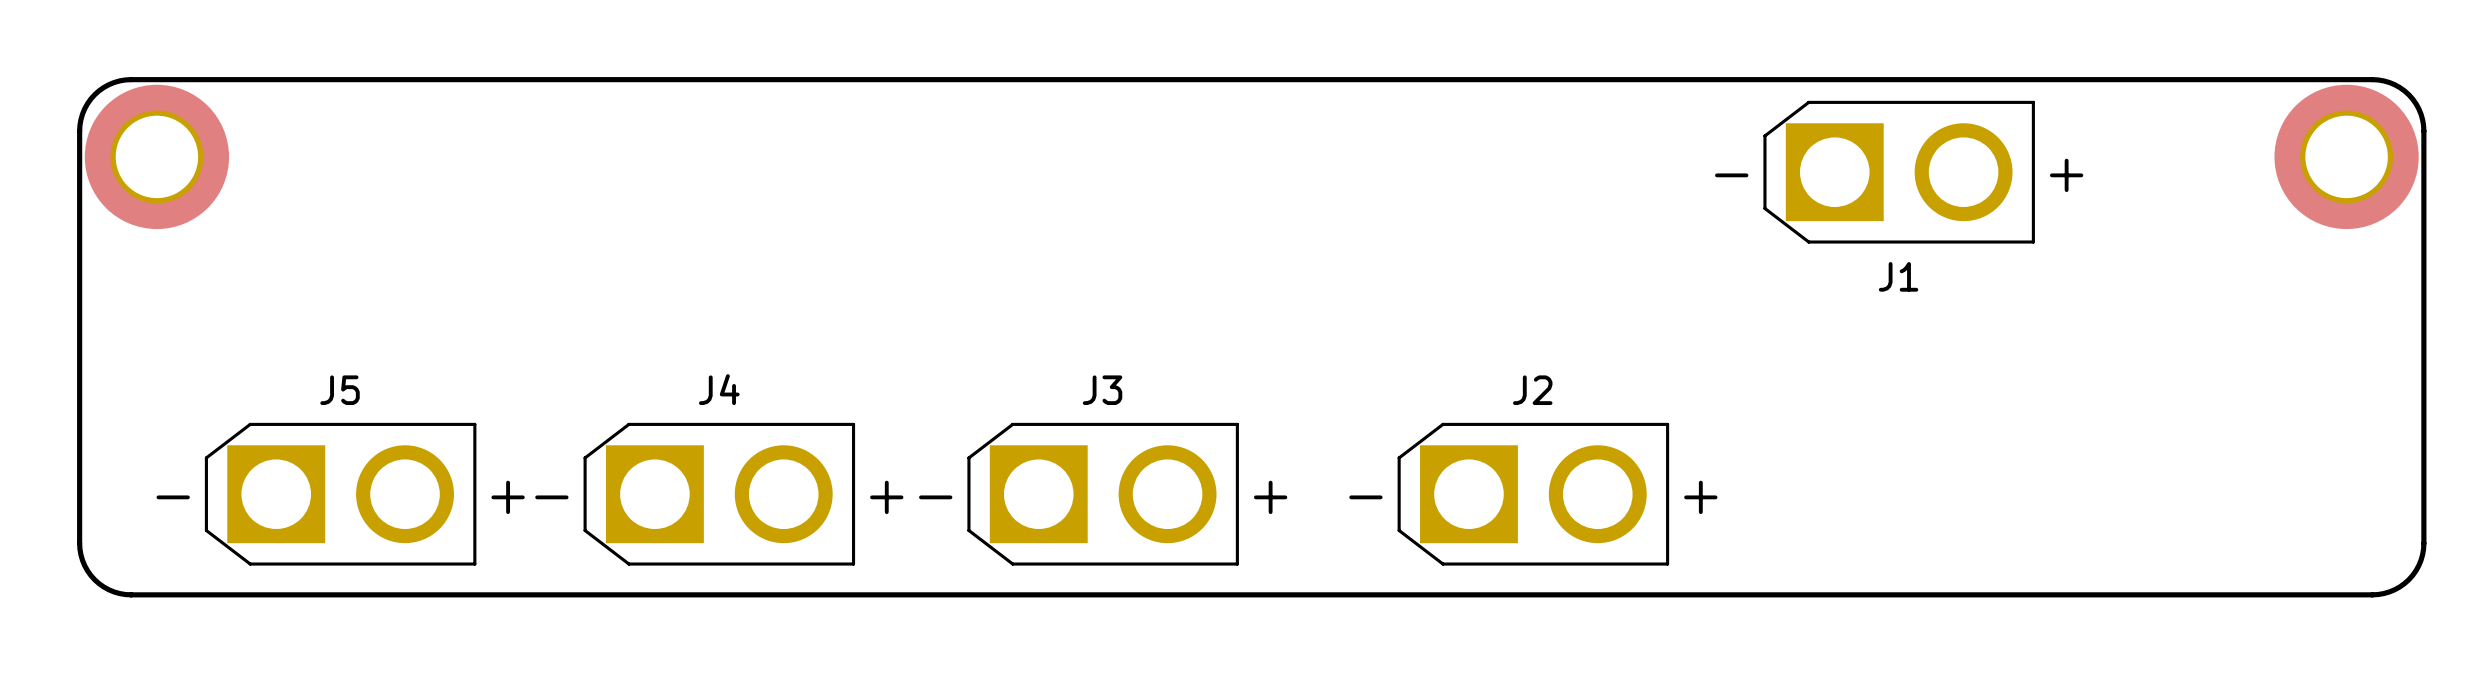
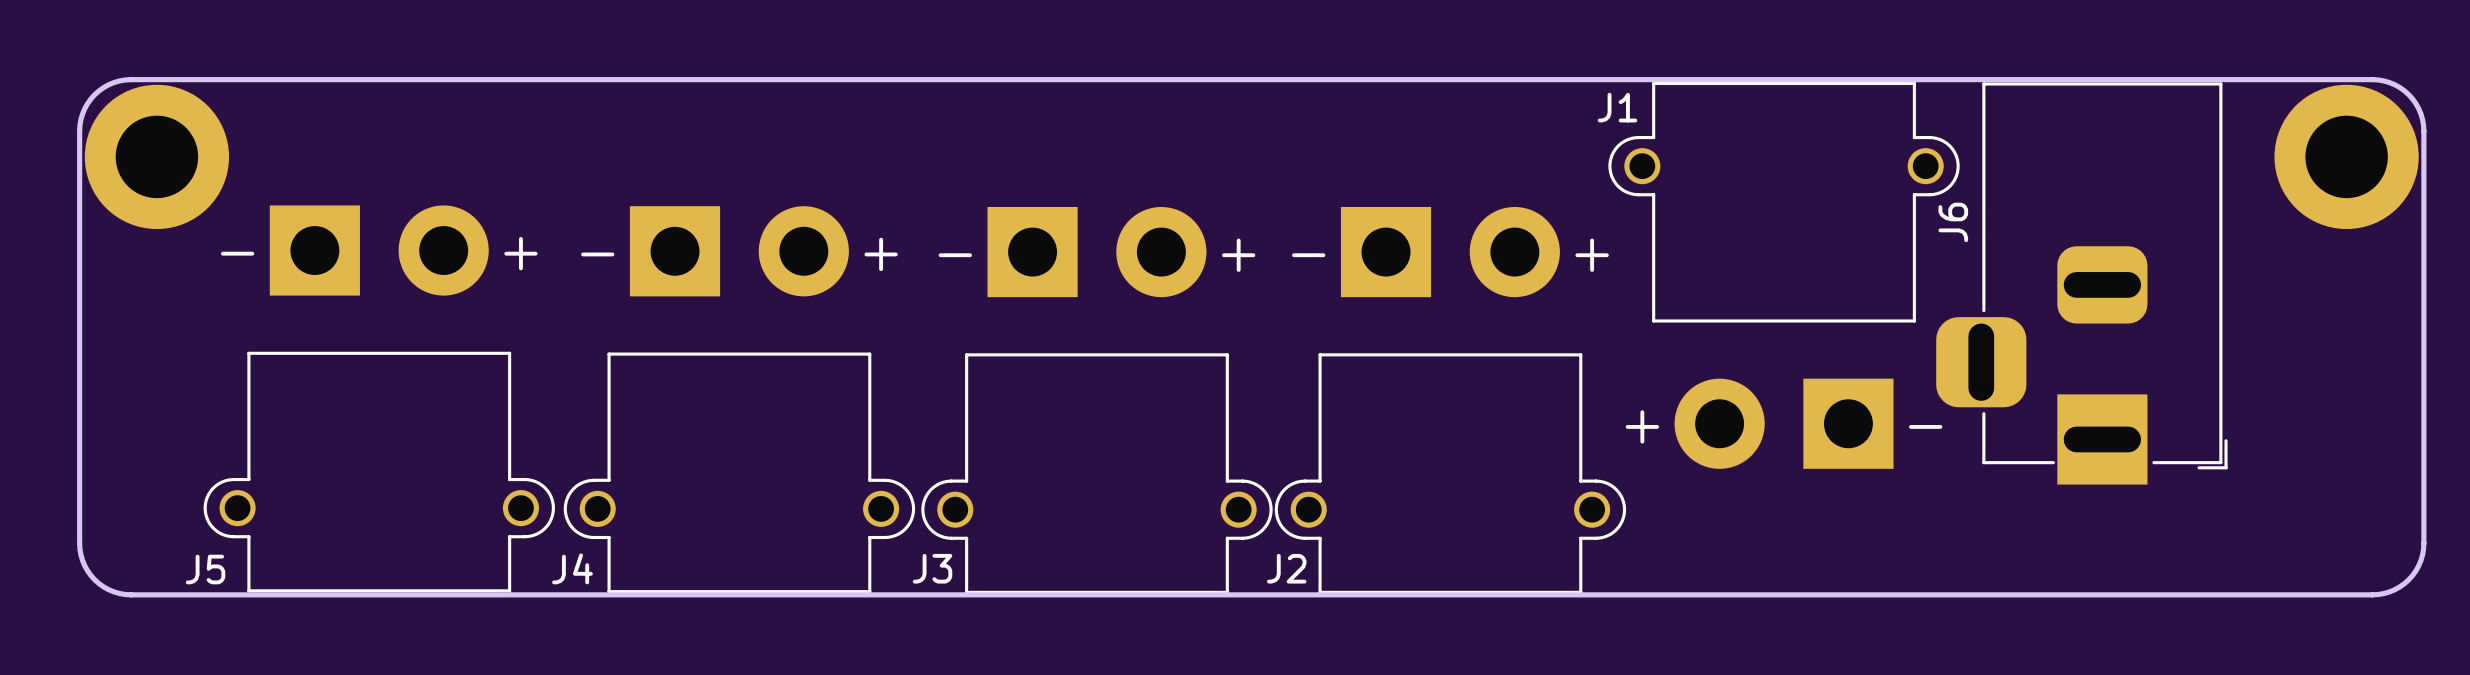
J1 footprint: [1763, 100, 2035, 244] -> [1608, 81, 1960, 469]
J1 name position: J1 (1898, 276) -> J1 (1617, 107)
J6: none -> (2081, 283)
J4 name position: J4 (719, 389) -> J4 (572, 568)
J5 name position: J5 (340, 390) -> J5 (205, 569)
J3 name position: J3 (1102, 390) -> J3 (932, 568)
J2 name position: J2 (1532, 390) -> J2 (1286, 568)
J5 footprint: [204, 422, 477, 566] -> [203, 205, 555, 593]
J4 footprint: [583, 422, 856, 566] -> [563, 206, 916, 594]
J3 footprint: [967, 422, 1239, 566] -> [921, 206, 1273, 594]
J2 footprint: [1397, 422, 1670, 566] -> [1274, 206, 1627, 594]

